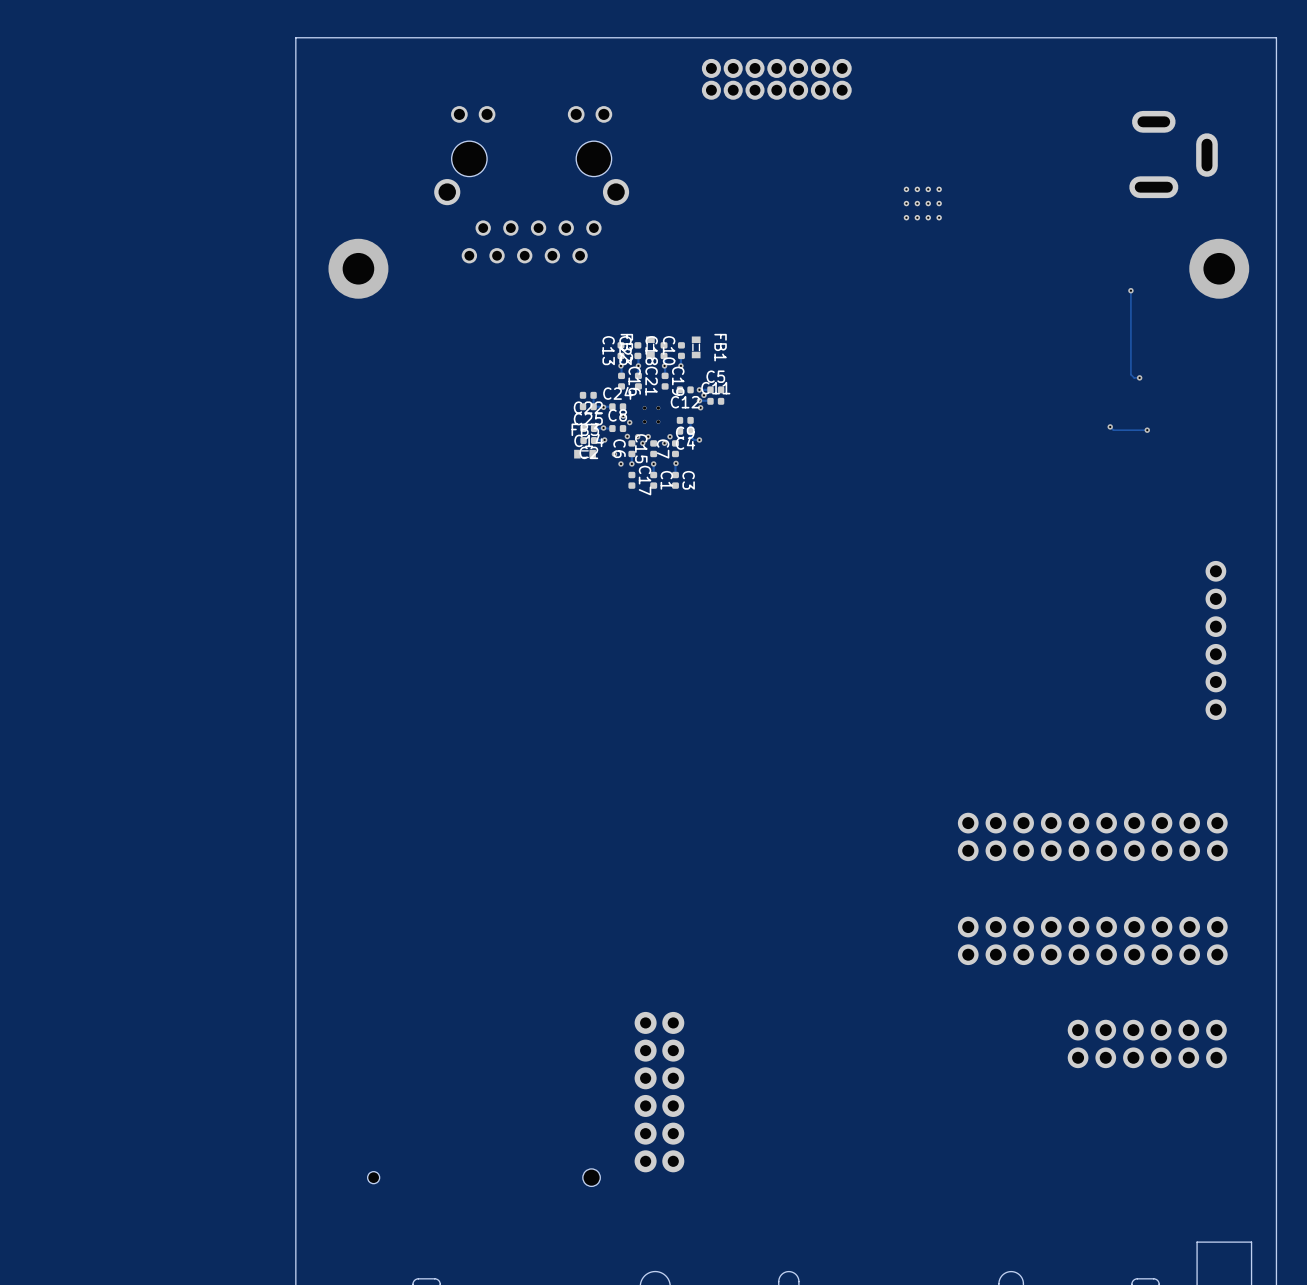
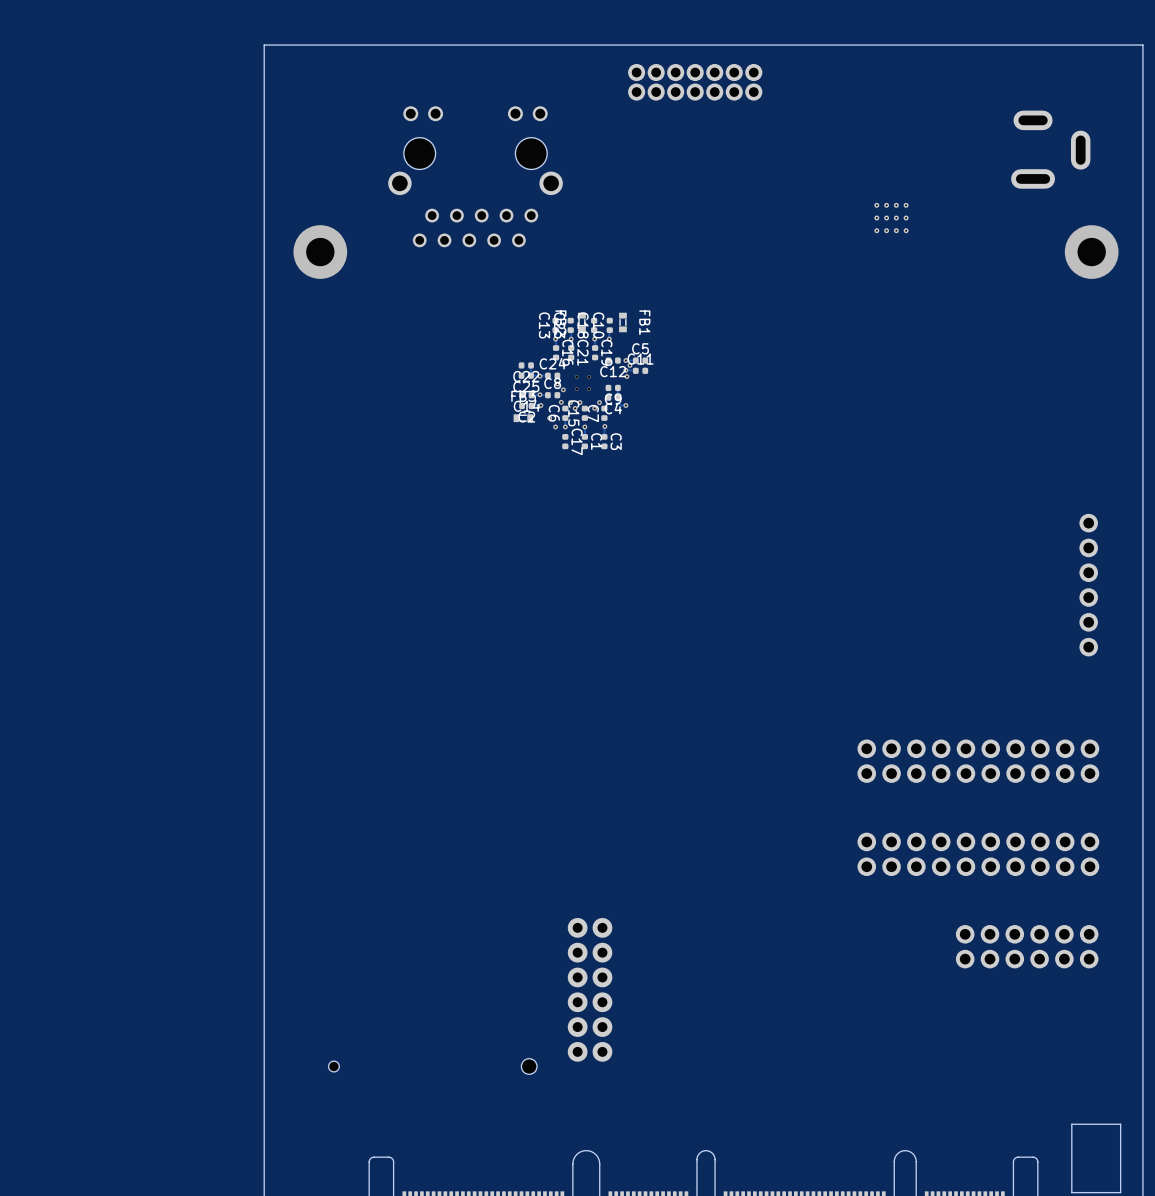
part position: (922, 203) -> (891, 218)
track: (1130, 290) (1130, 374) (1134, 377) (1139, 377) -> none
via: (1130, 290) -> none
via: (1139, 377) -> none
track: (1110, 426) (1113, 430) (1147, 430) -> none
via: (1110, 426) -> none
via: (1147, 430) -> none

